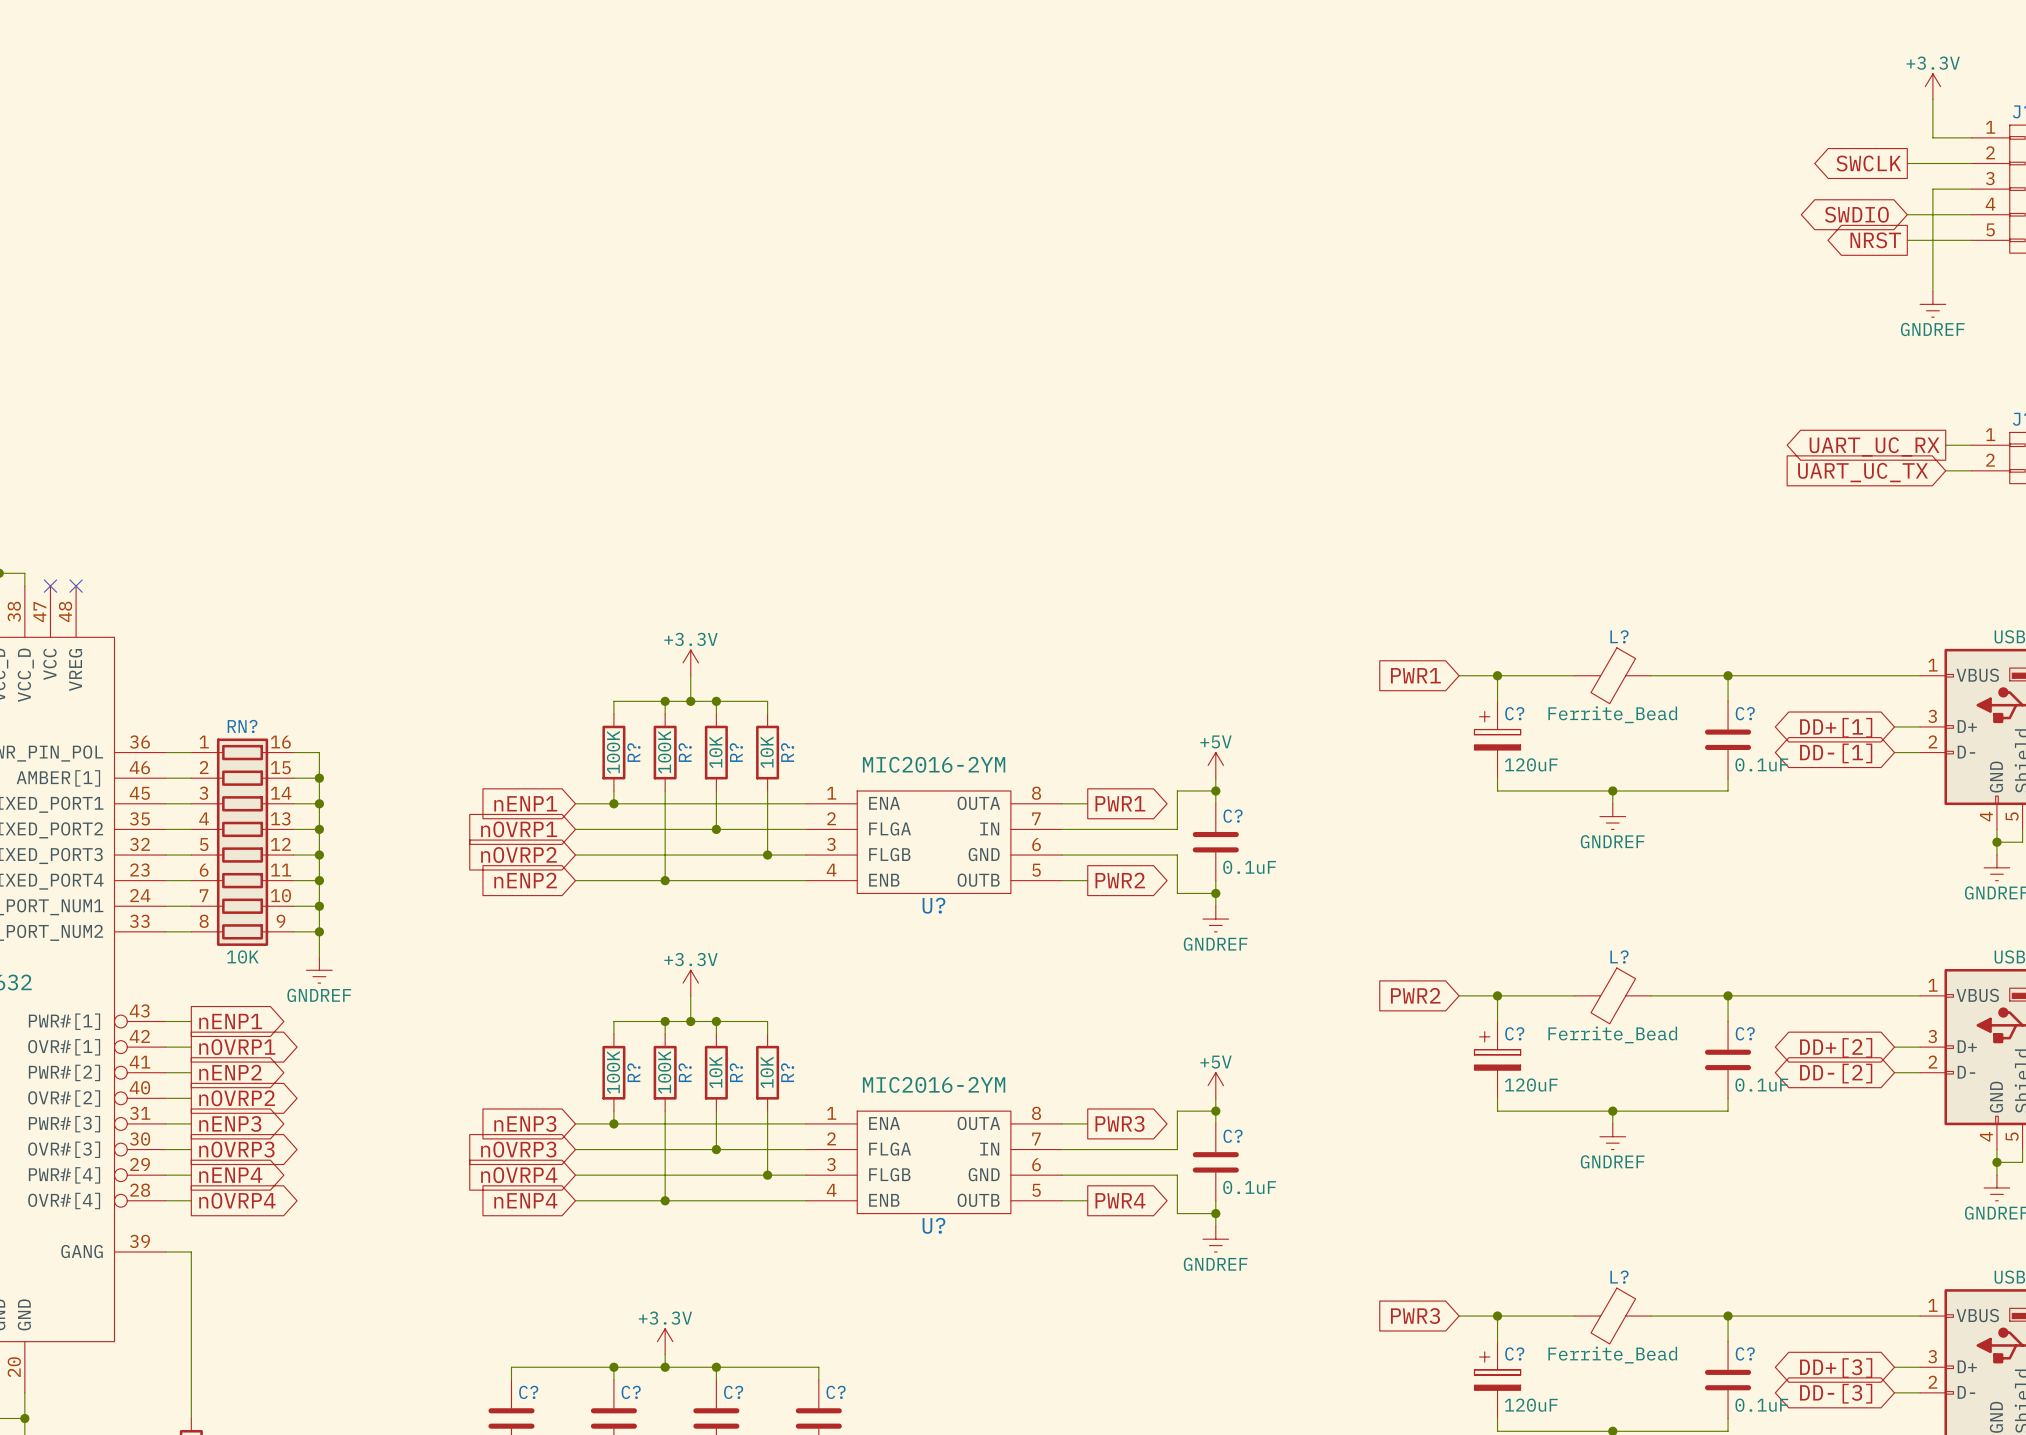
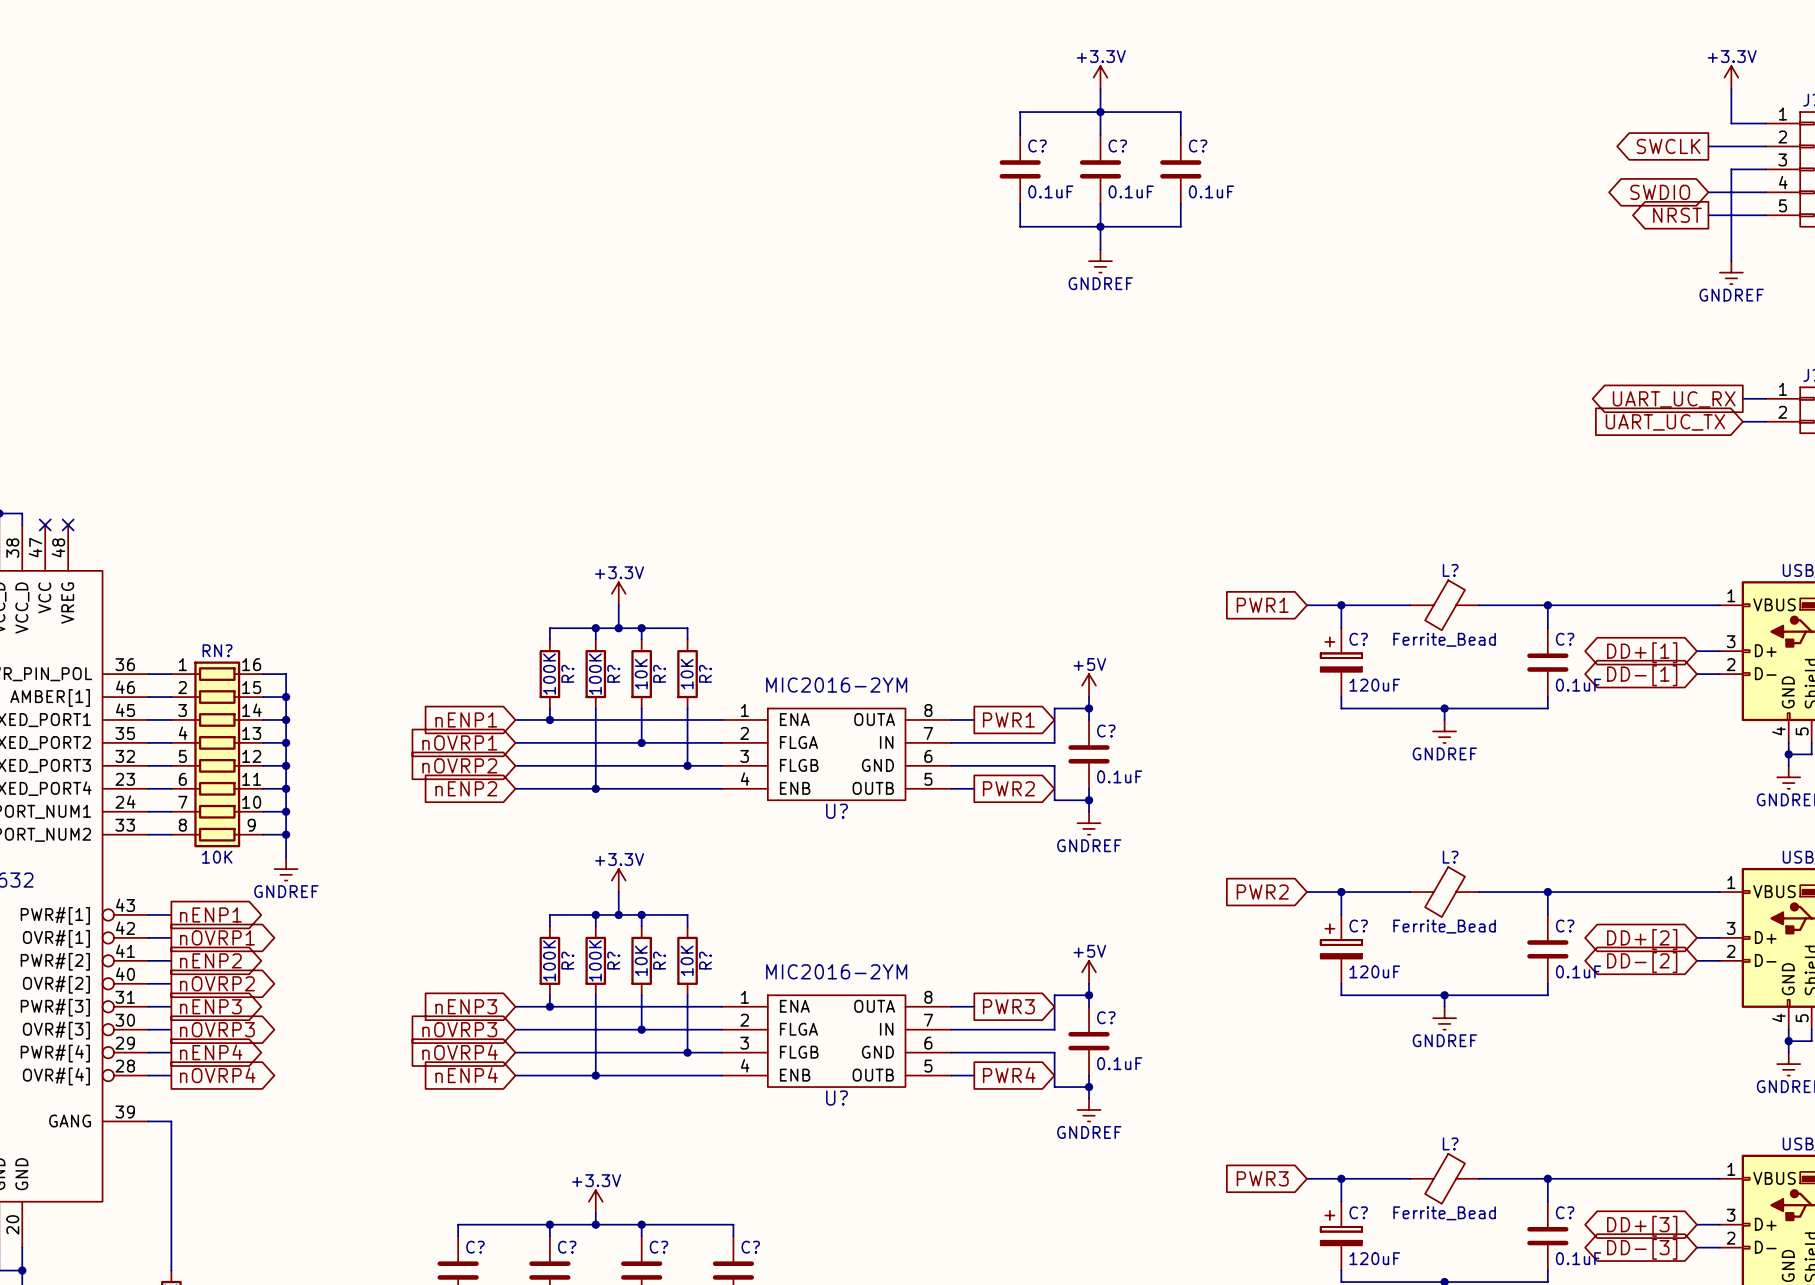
power symbol: none -> +3.3V (1100, 77)
wire: none -> (1100, 89) (1100, 134)
junction: none -> (1100, 112)
wire: none -> (1020, 134) (1020, 112) (1180, 112) (1180, 134)
C?: none -> 0.1uF (1020, 169)
C?: none -> 0.1uF (1100, 169)
C?: none -> 0.1uF (1180, 169)
wire: none -> (1020, 203) (1020, 226) (1180, 226) (1180, 203)
wire: none -> (1100, 203) (1100, 249)
junction: none -> (1100, 226)
power symbol: none -> GNDREF (1100, 261)

